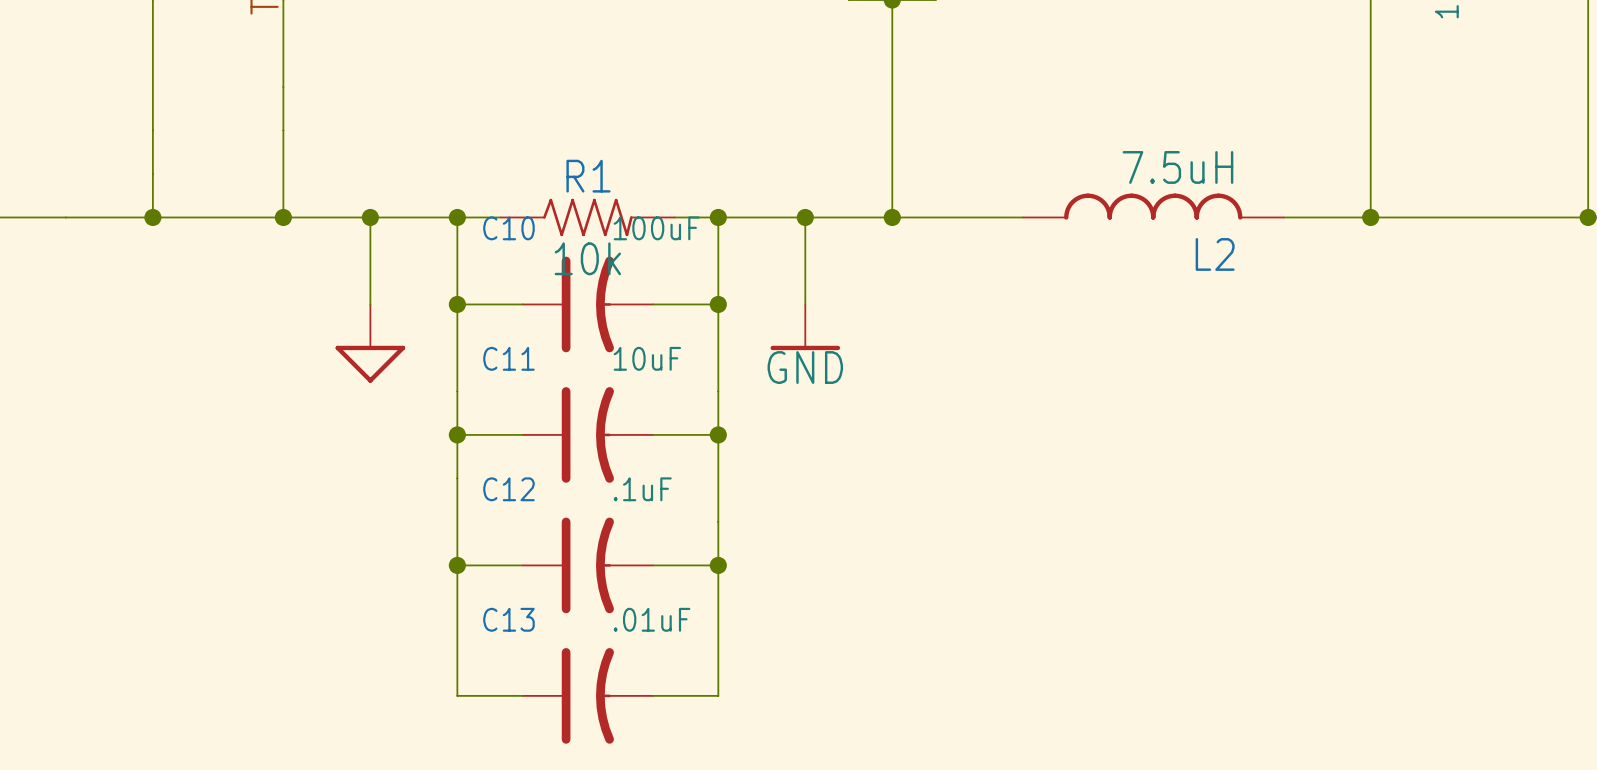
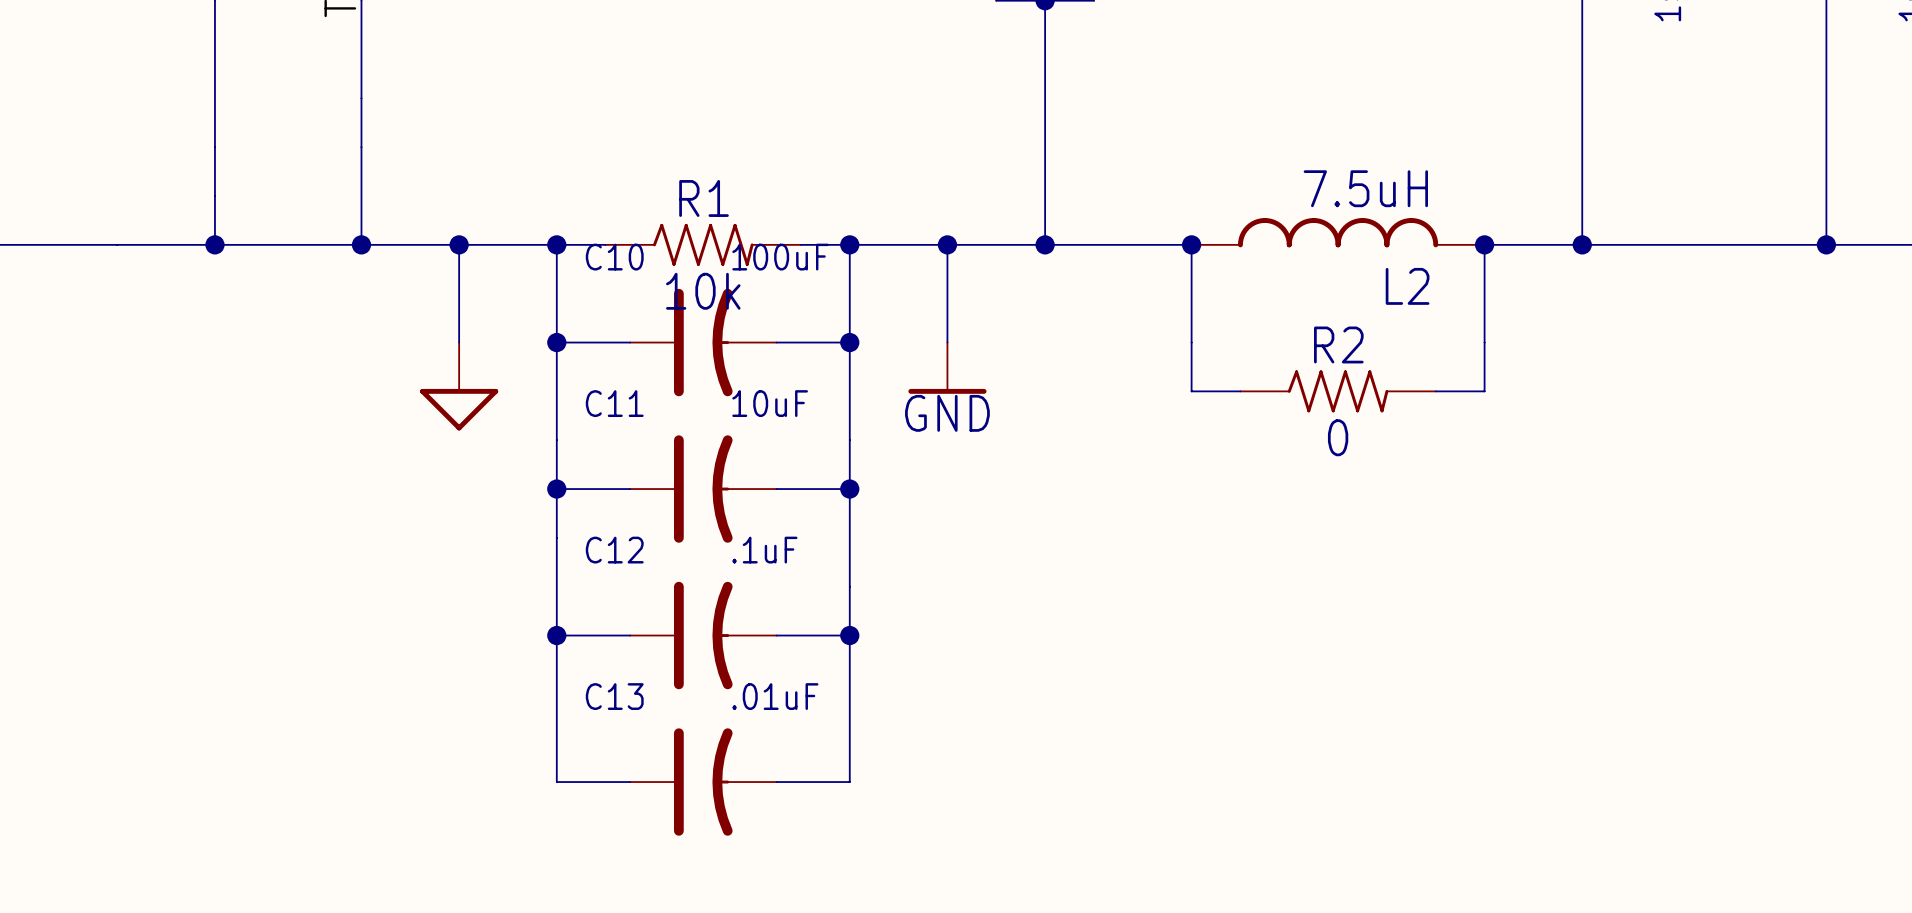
wire: none -> (1191, 244) (1191, 391) (1240, 391)
junction: none -> (1191, 244)
wire: none -> (1484, 244) (1484, 391) (1435, 391)
junction: none -> (1484, 244)
R2: none -> 0 (1338, 391)

